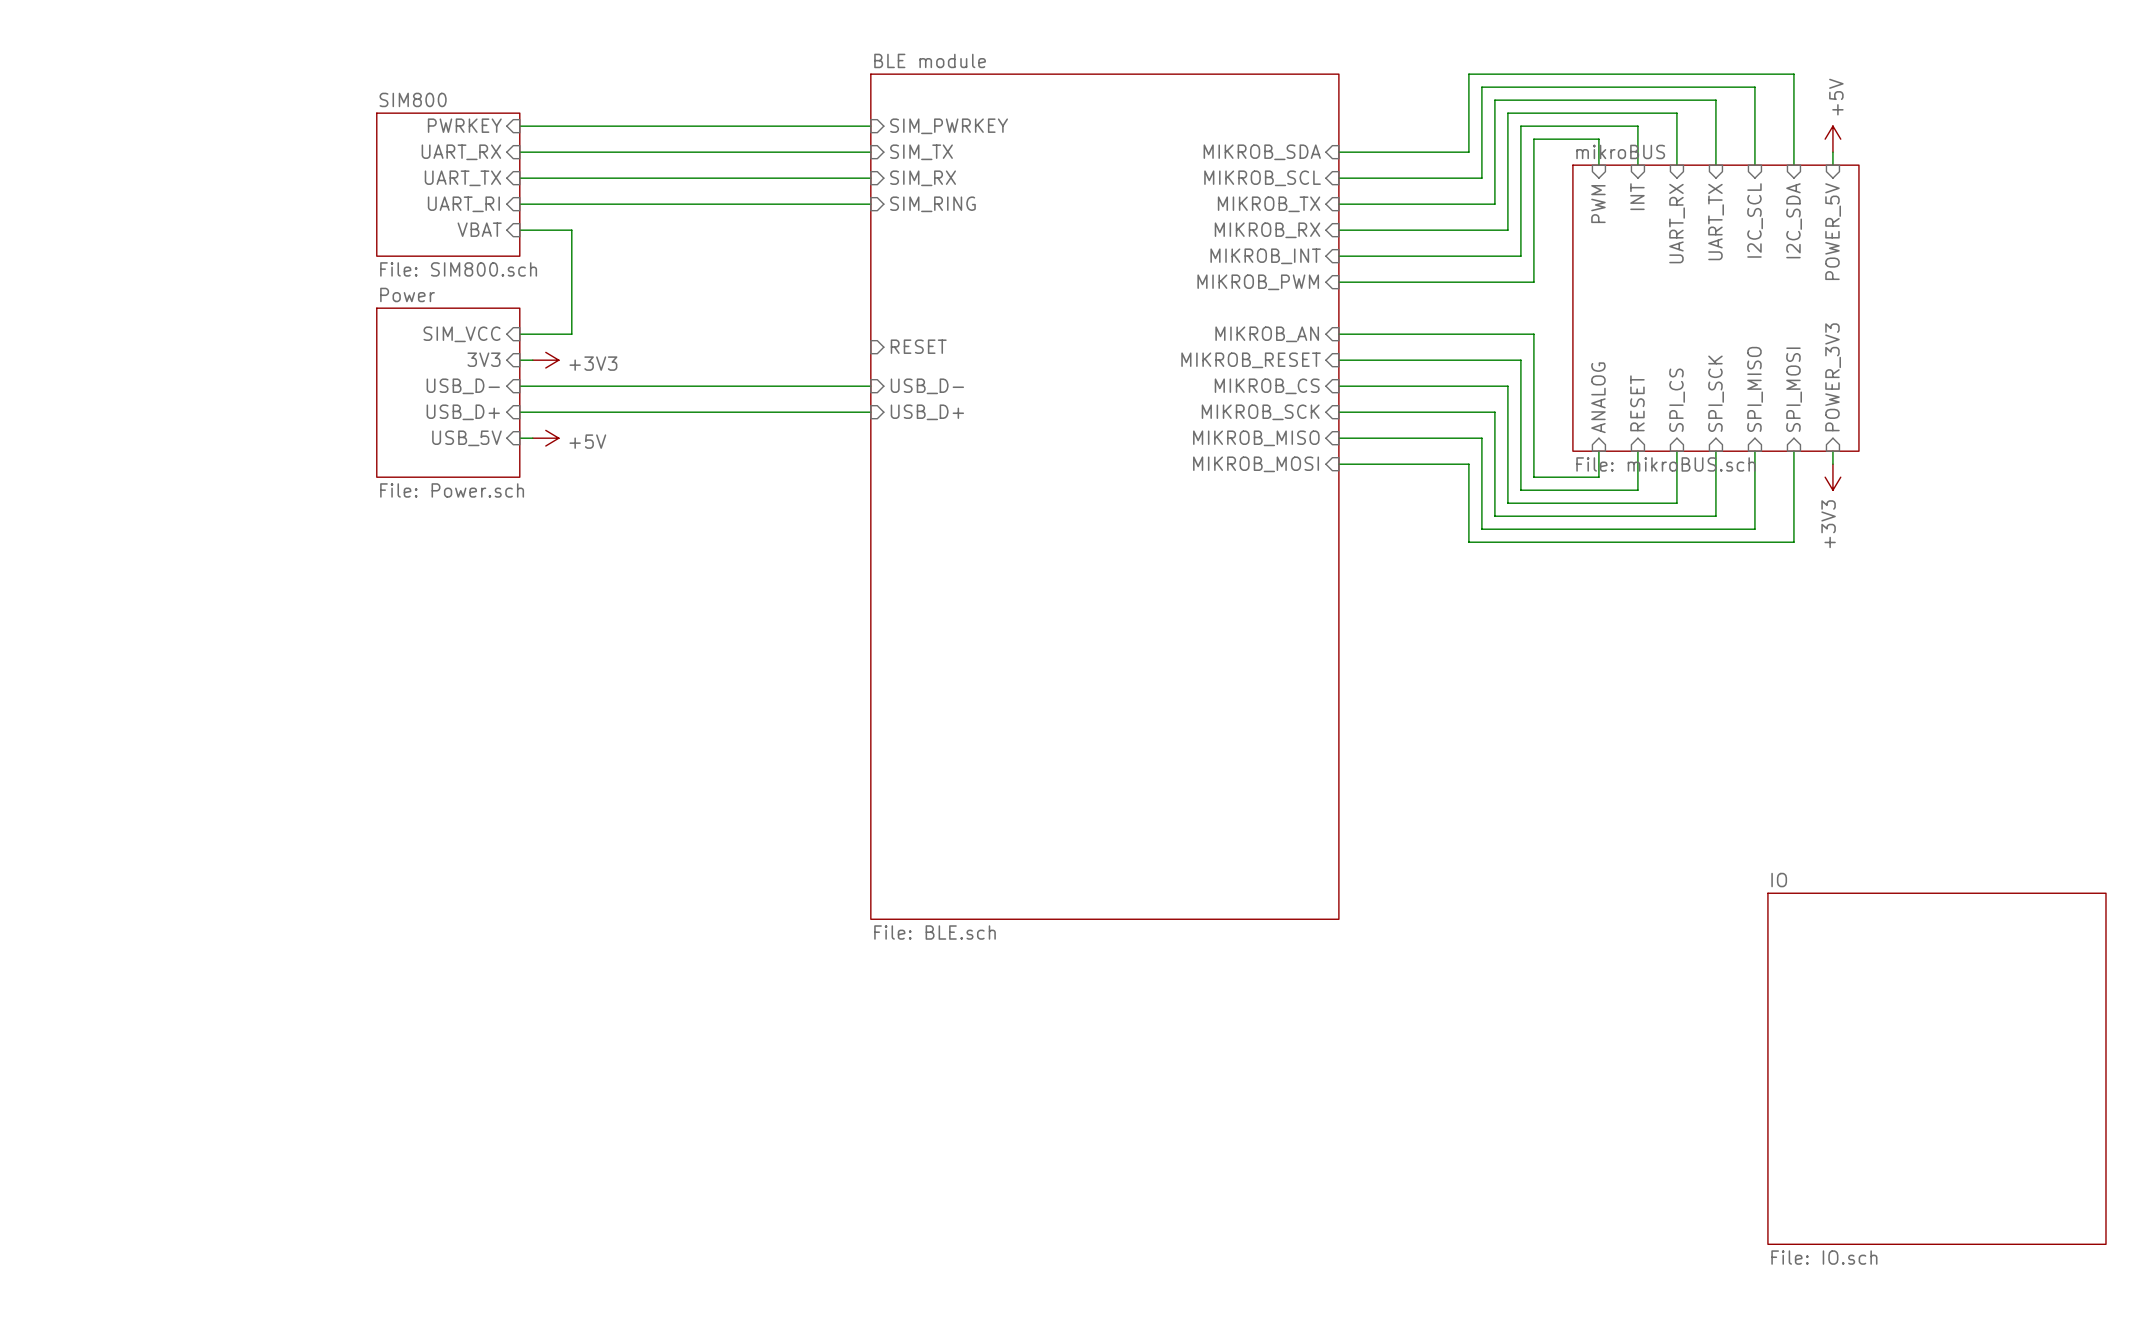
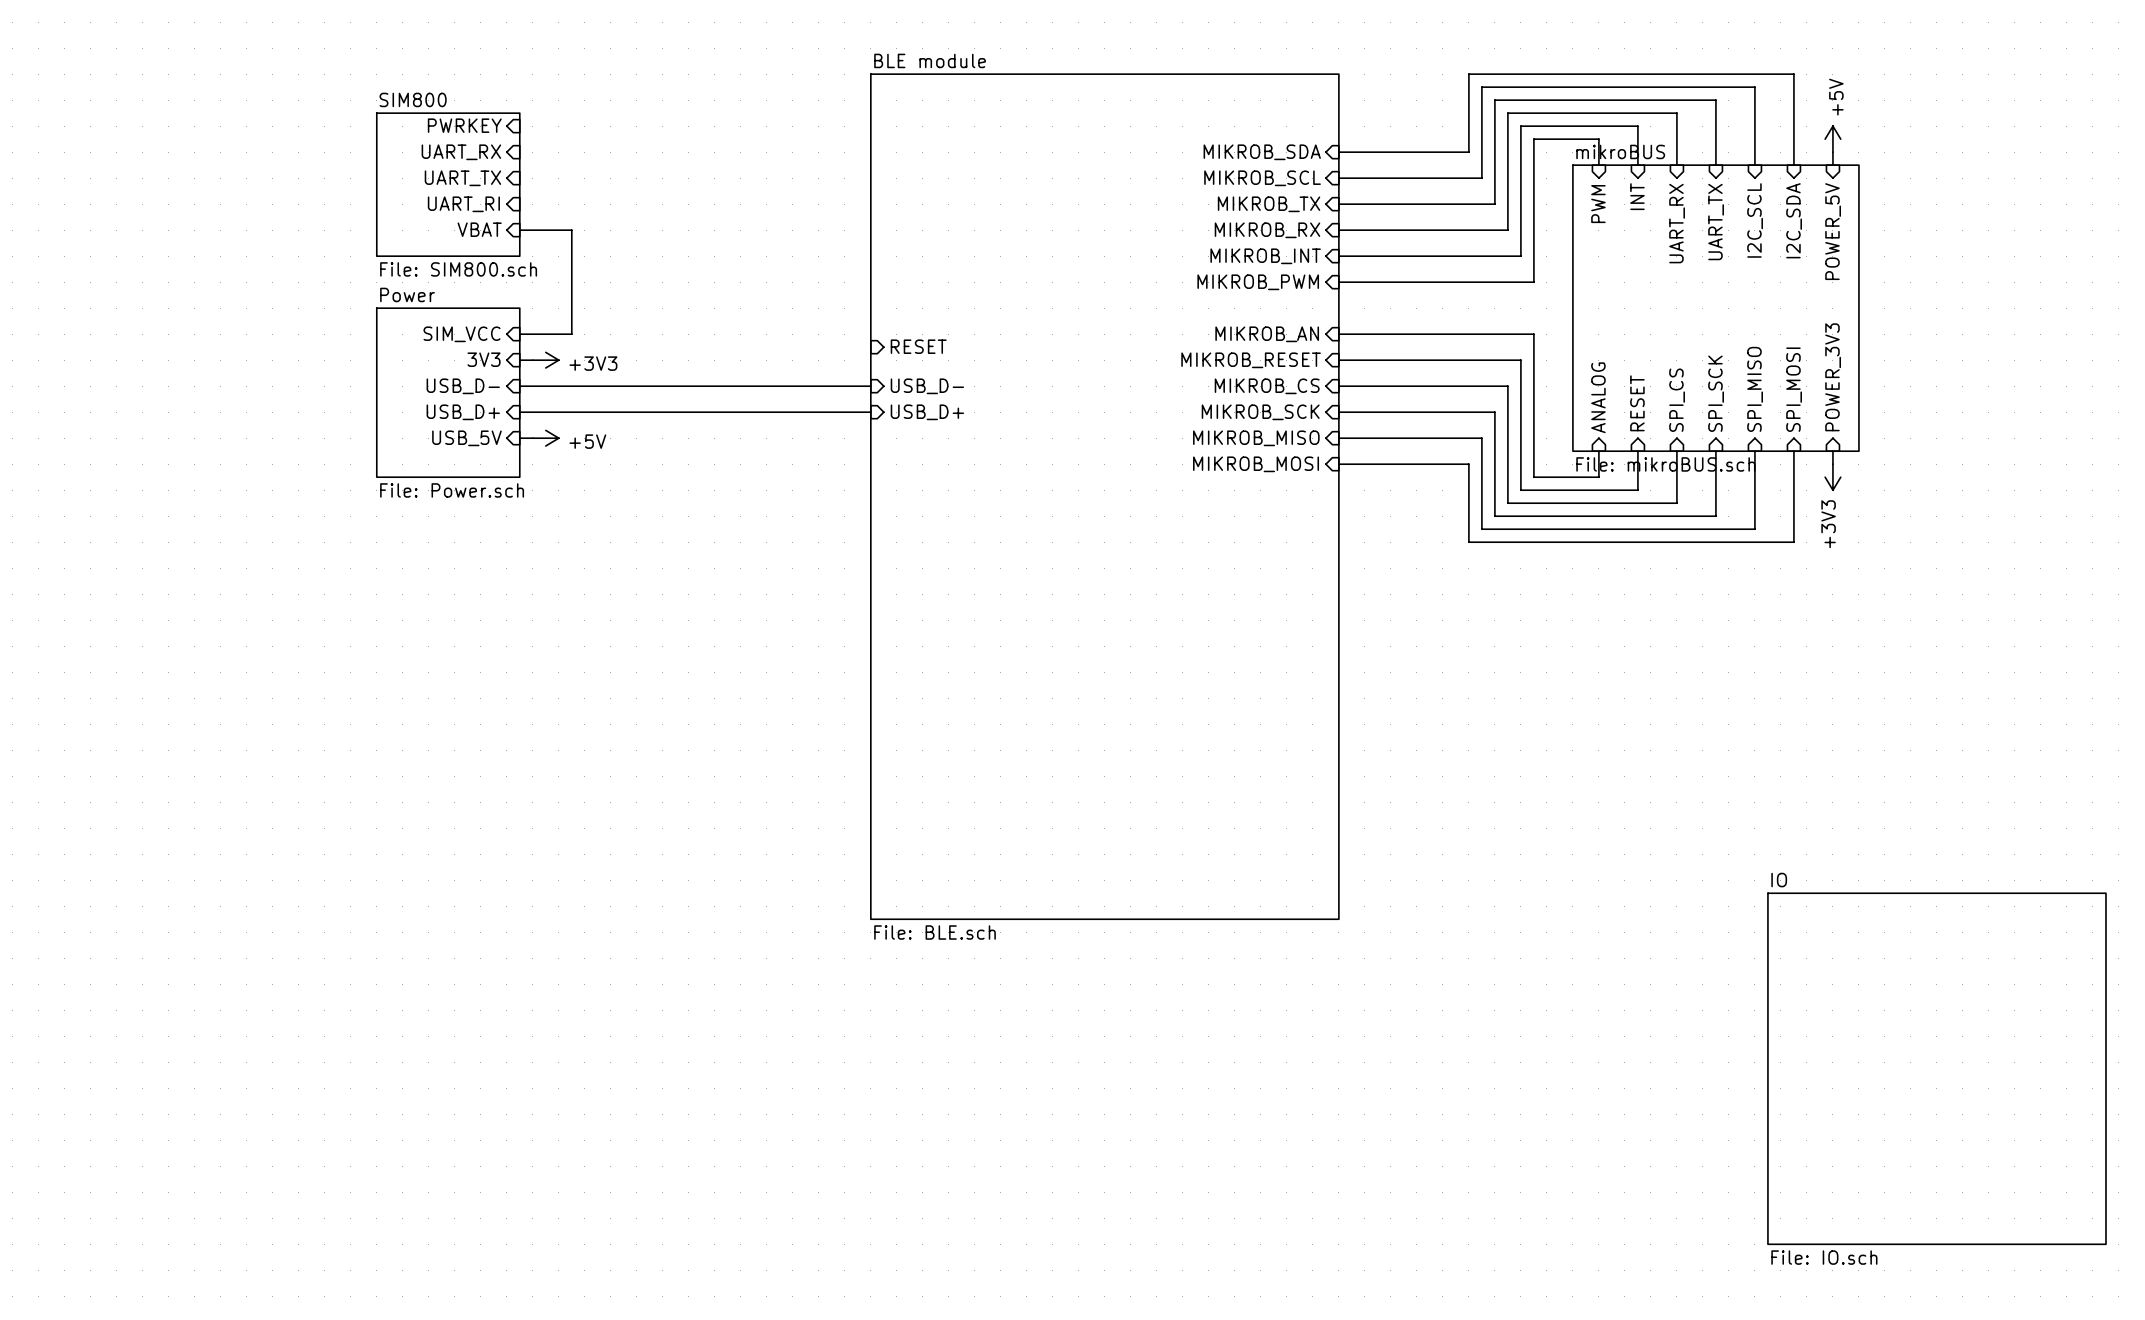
wire: (519, 126) (870, 126) -> none
sheet pin: SIM_PWRKEY (949, 126) -> none
wire: (519, 152) (870, 152) -> none
sheet pin: SIM_TX (921, 152) -> none
wire: (519, 178) (870, 178) -> none
sheet pin: SIM_RX (923, 178) -> none
wire: (519, 204) (870, 204) -> none
sheet pin: SIM_RING (932, 204) -> none

